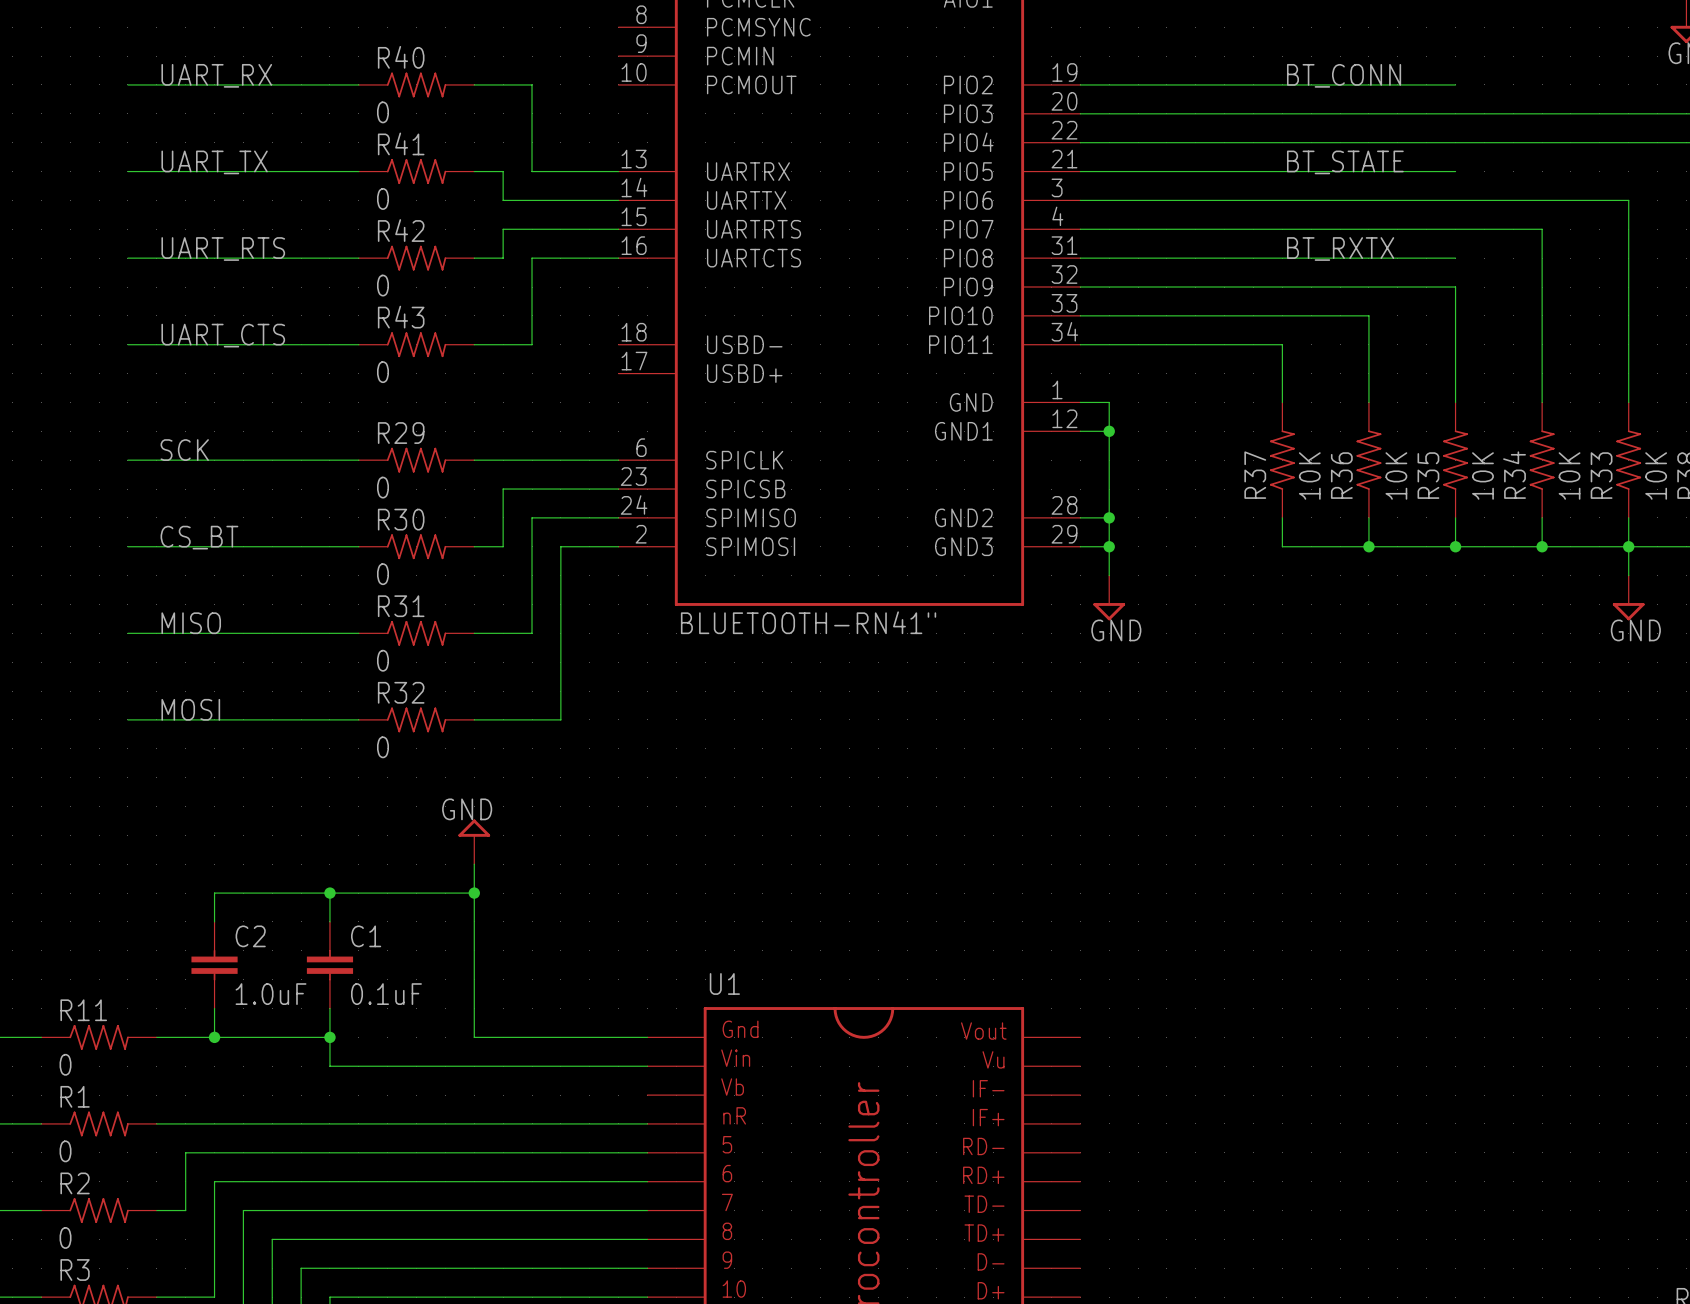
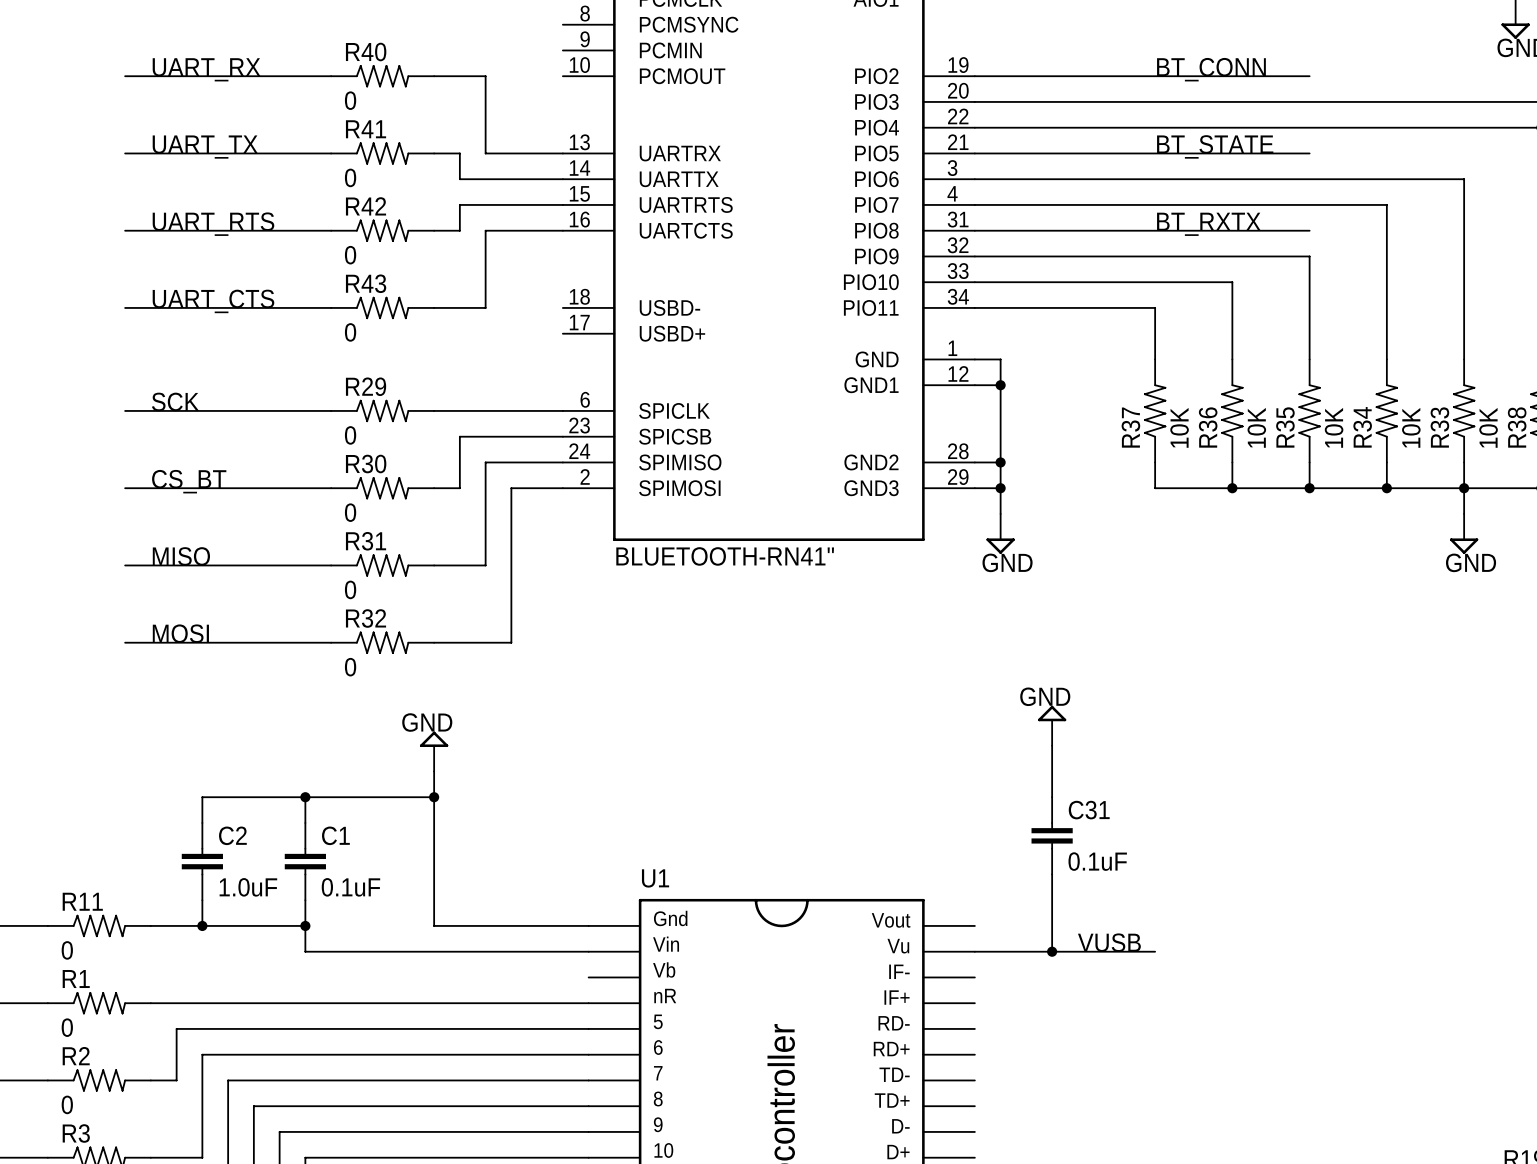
power symbol: none -> GND (1052, 725)
wire: none -> (1052, 745) (1052, 797)
C31: none -> 0.1uF (1052, 835)
wire: none -> (1052, 874) (1052, 951)
label: none -> VUSB (1109, 942)
wire: none -> (974, 951) (1155, 951)
junction: none -> (1052, 951)

